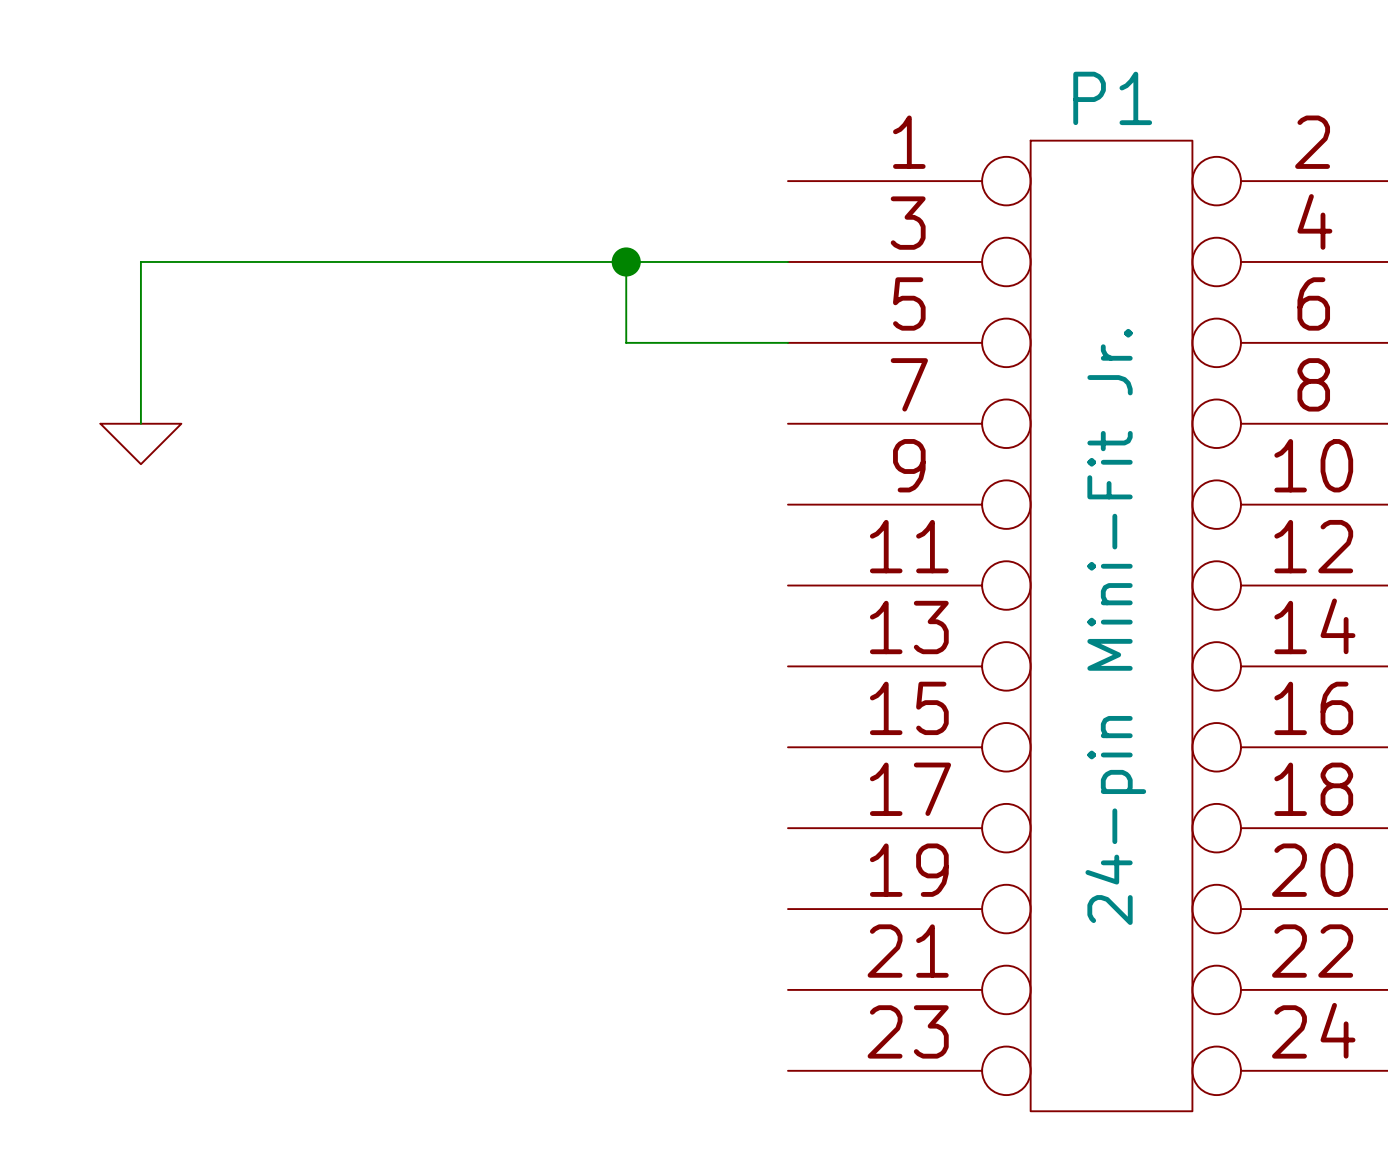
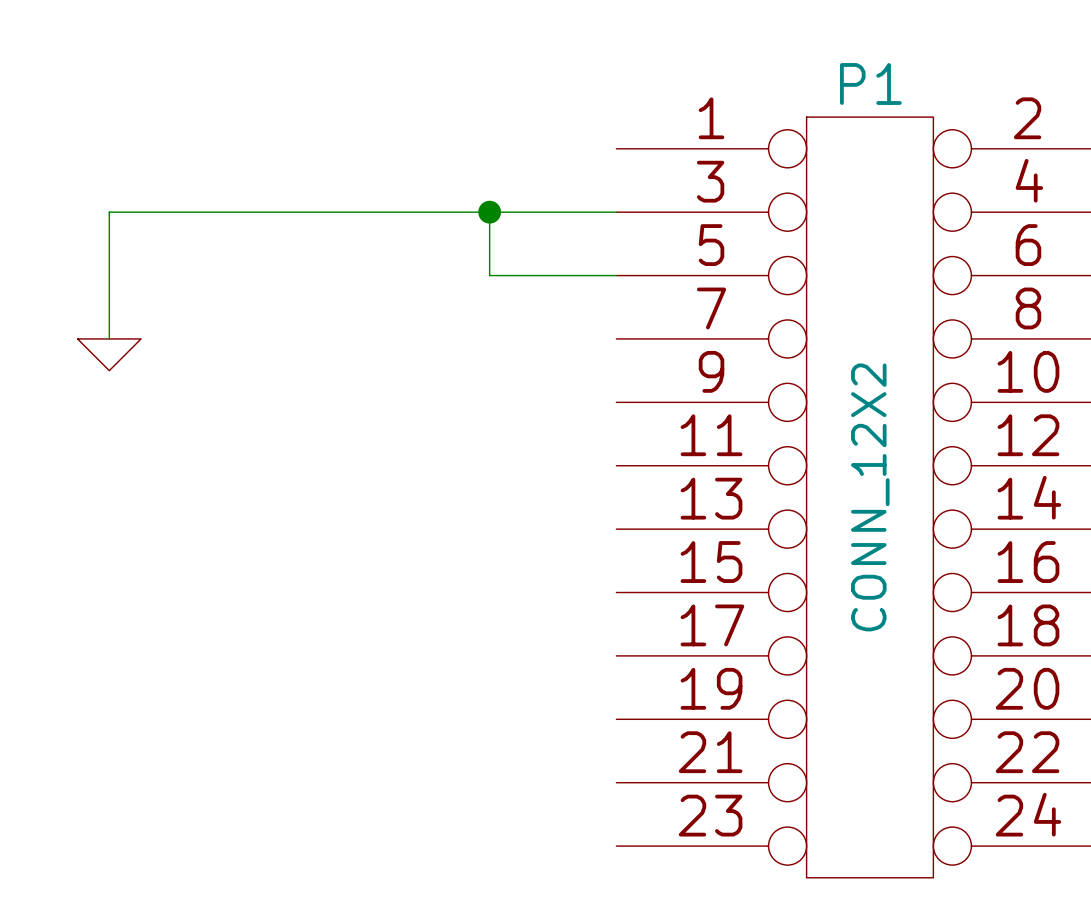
P1 value: 24-pin Mini-Fit Jr. (1115, 626) -> CONN_12X2 (870, 497)

